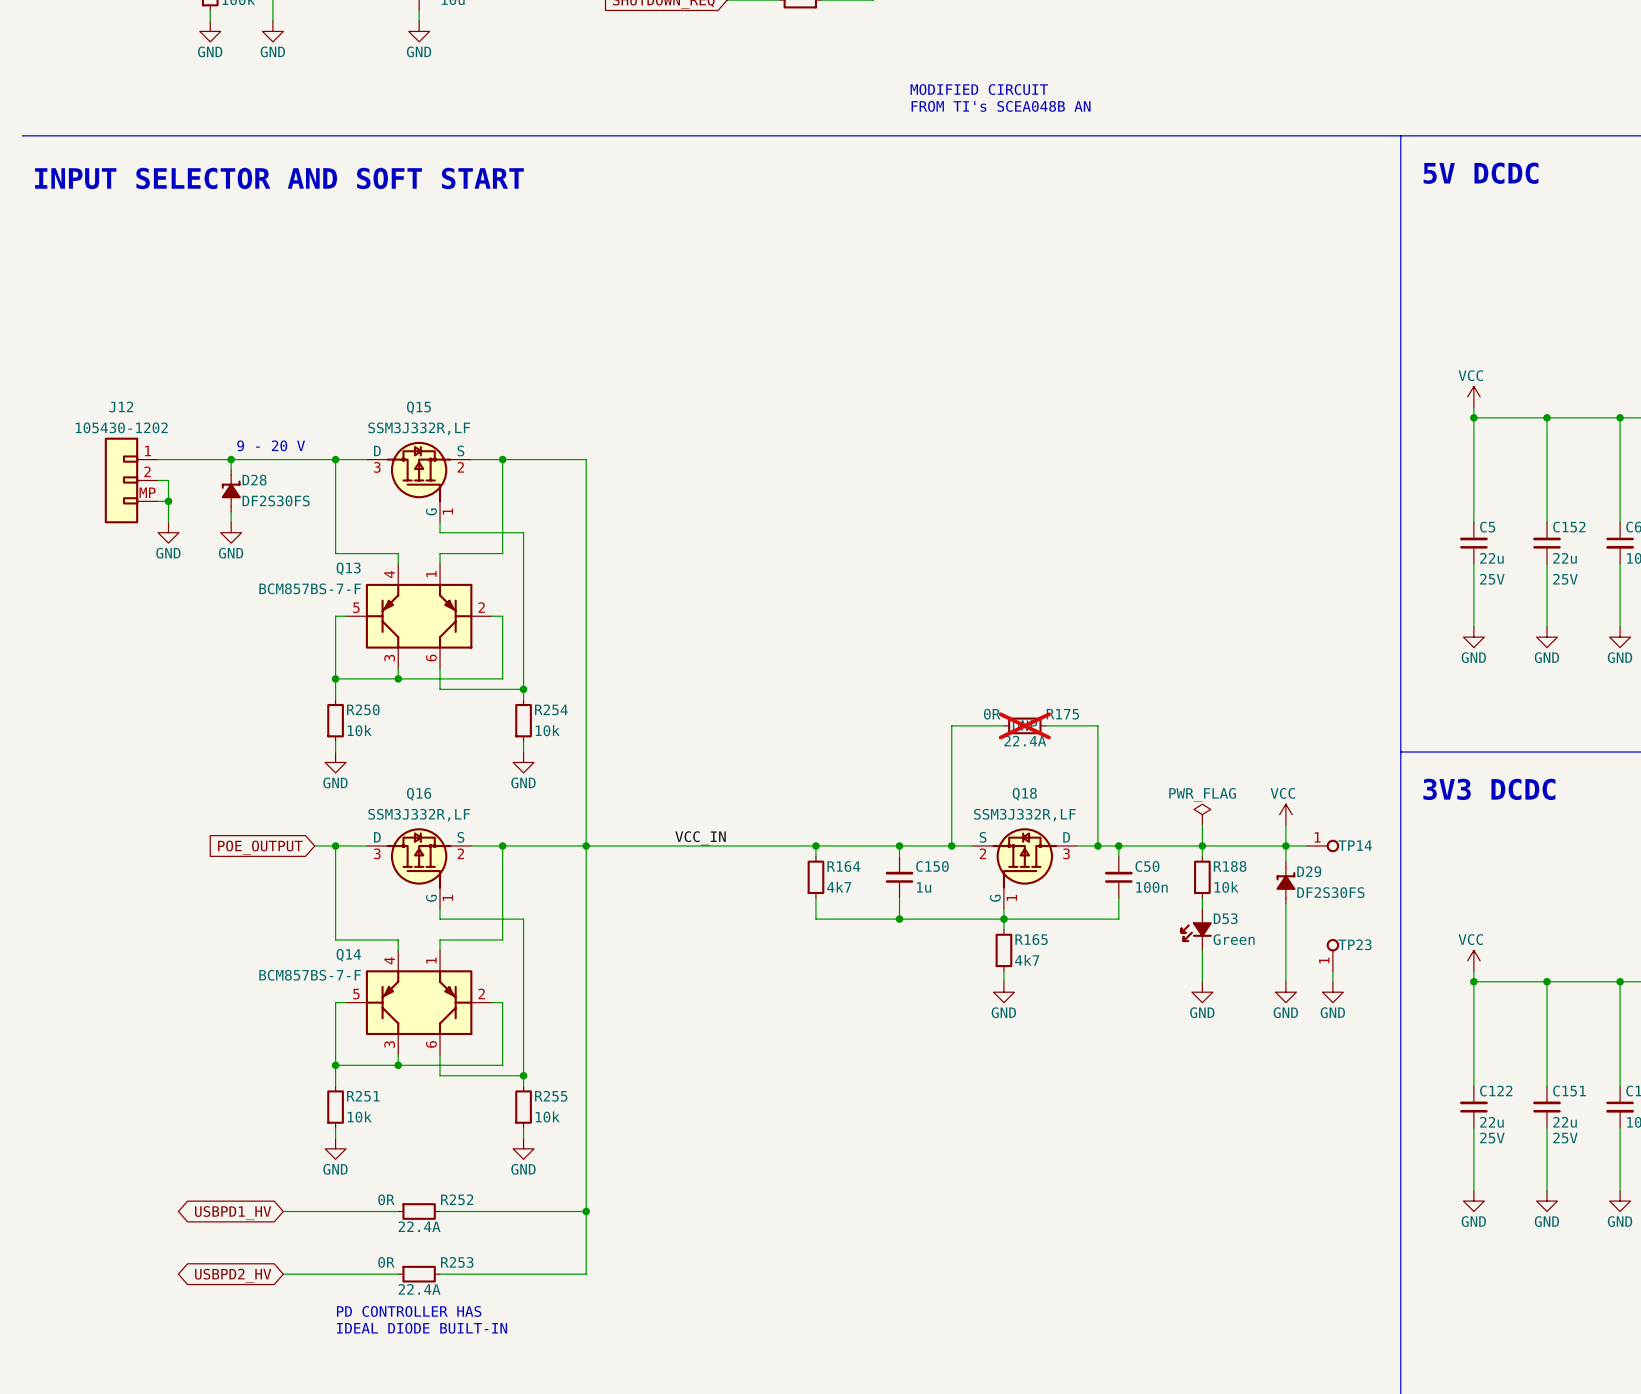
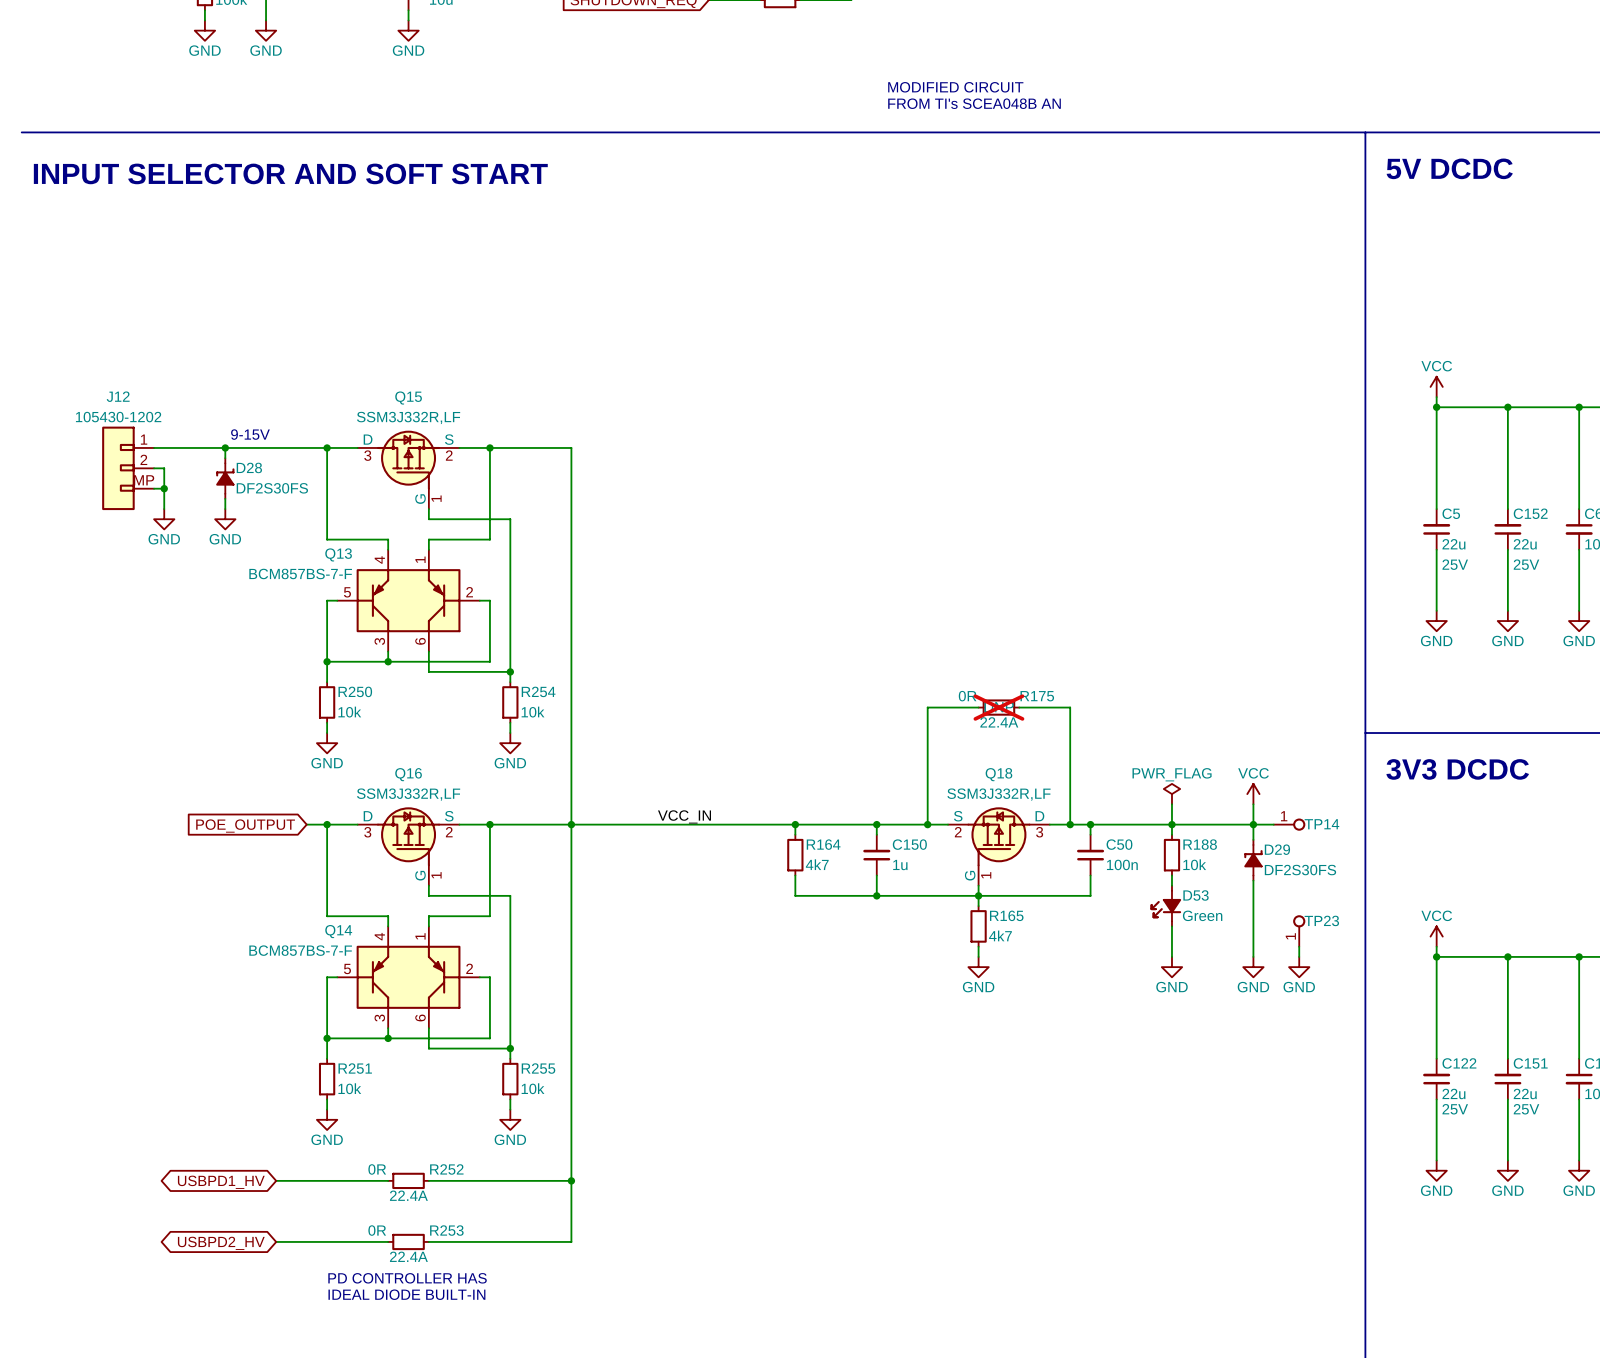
text: 9 - 20 V (271, 445) -> 9-15V (250, 434)

